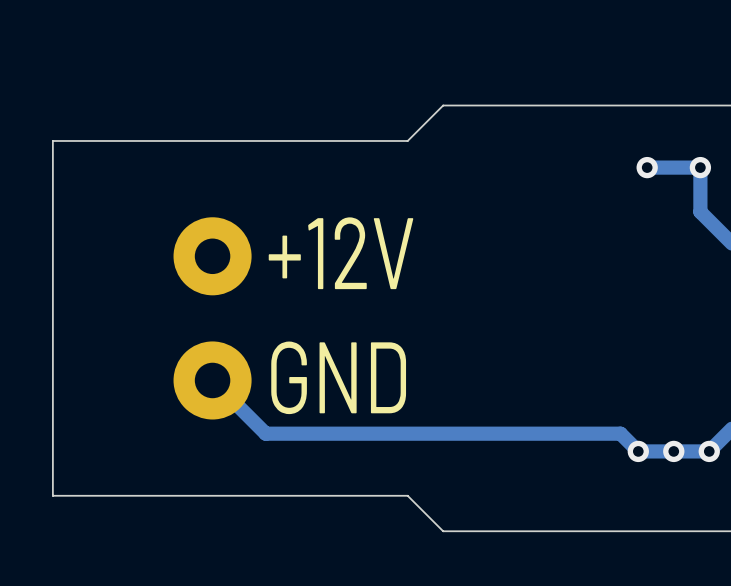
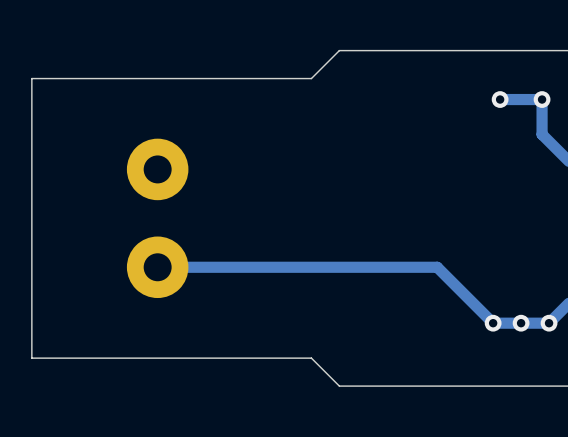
text: +12V (341, 253) -> none
text: GND (338, 377) -> none
track: (212, 380) (265, 433) (620, 433) -> (157, 267) (437, 267) (479, 309)

